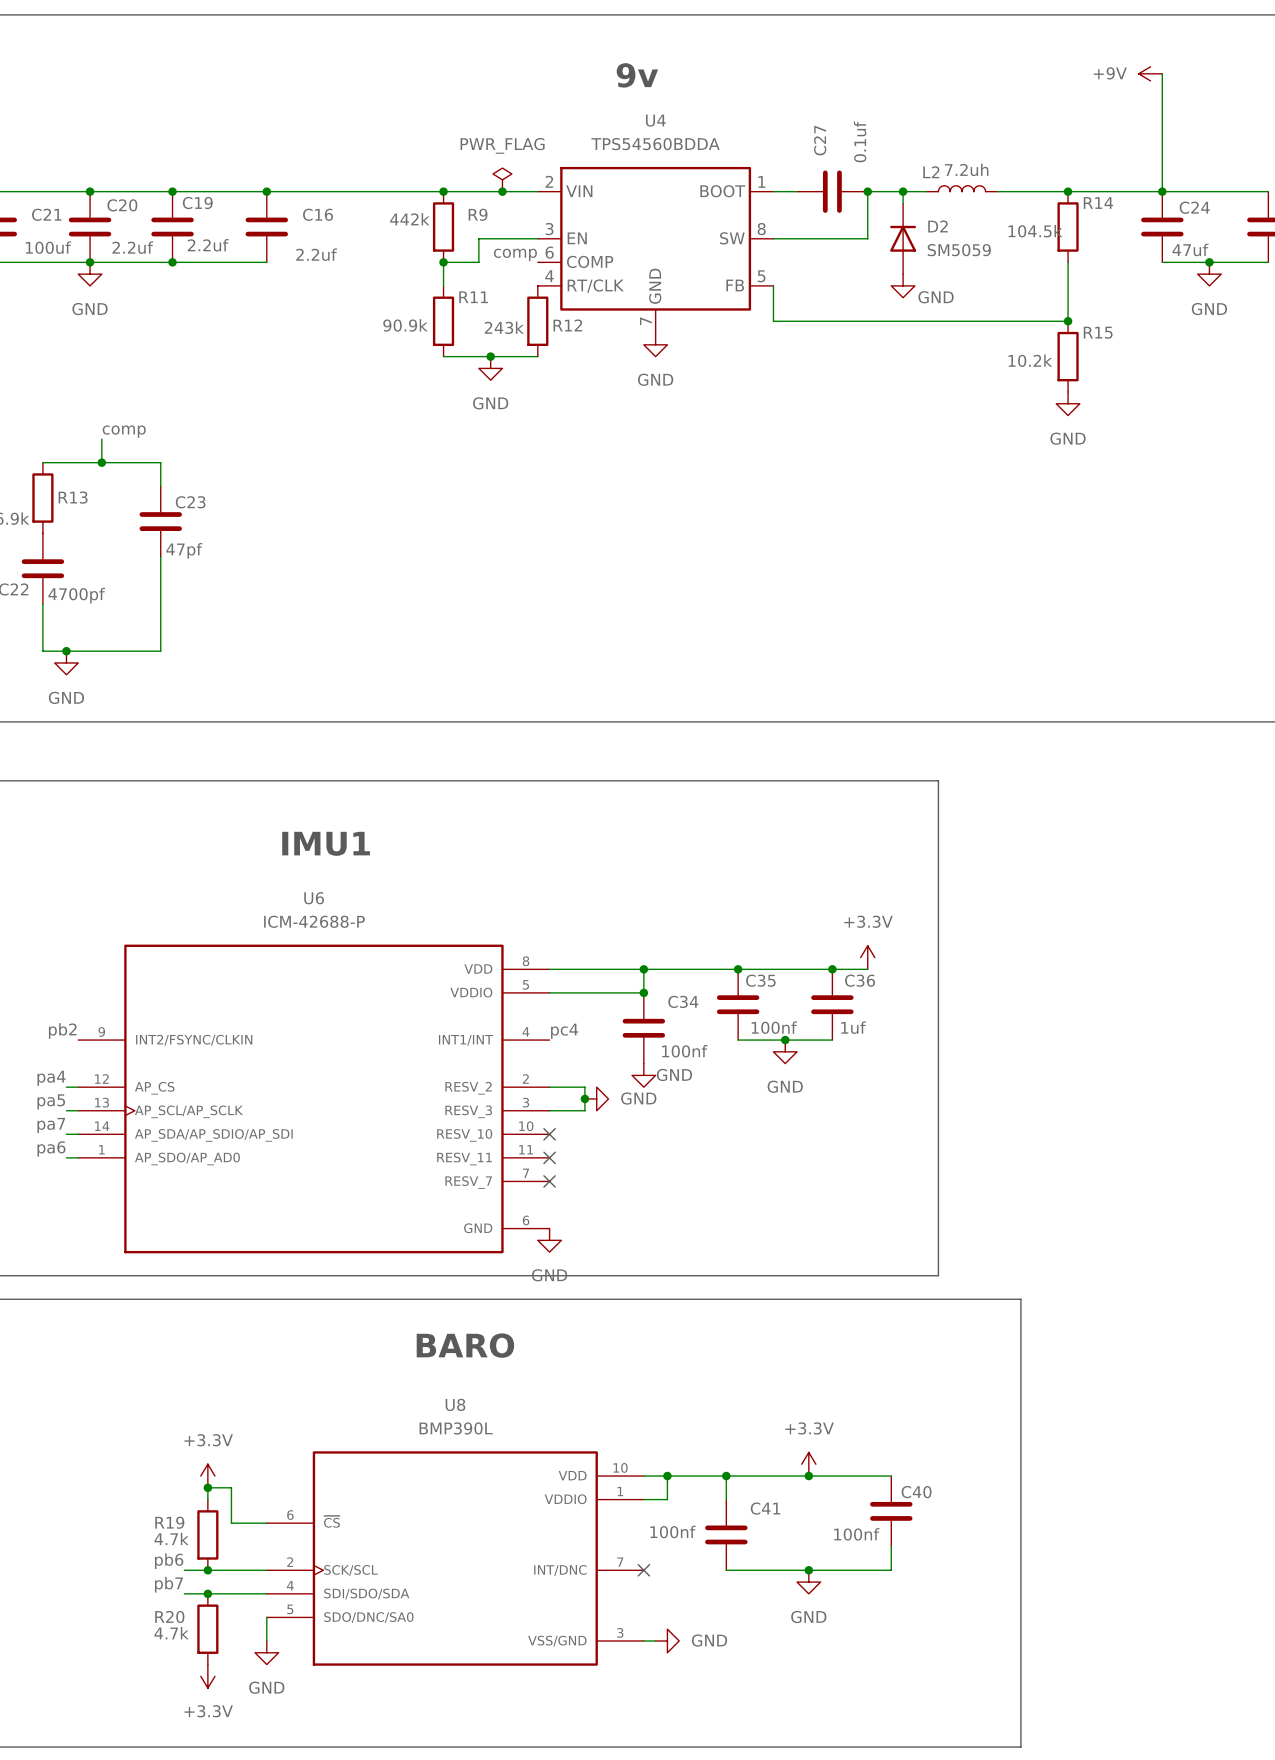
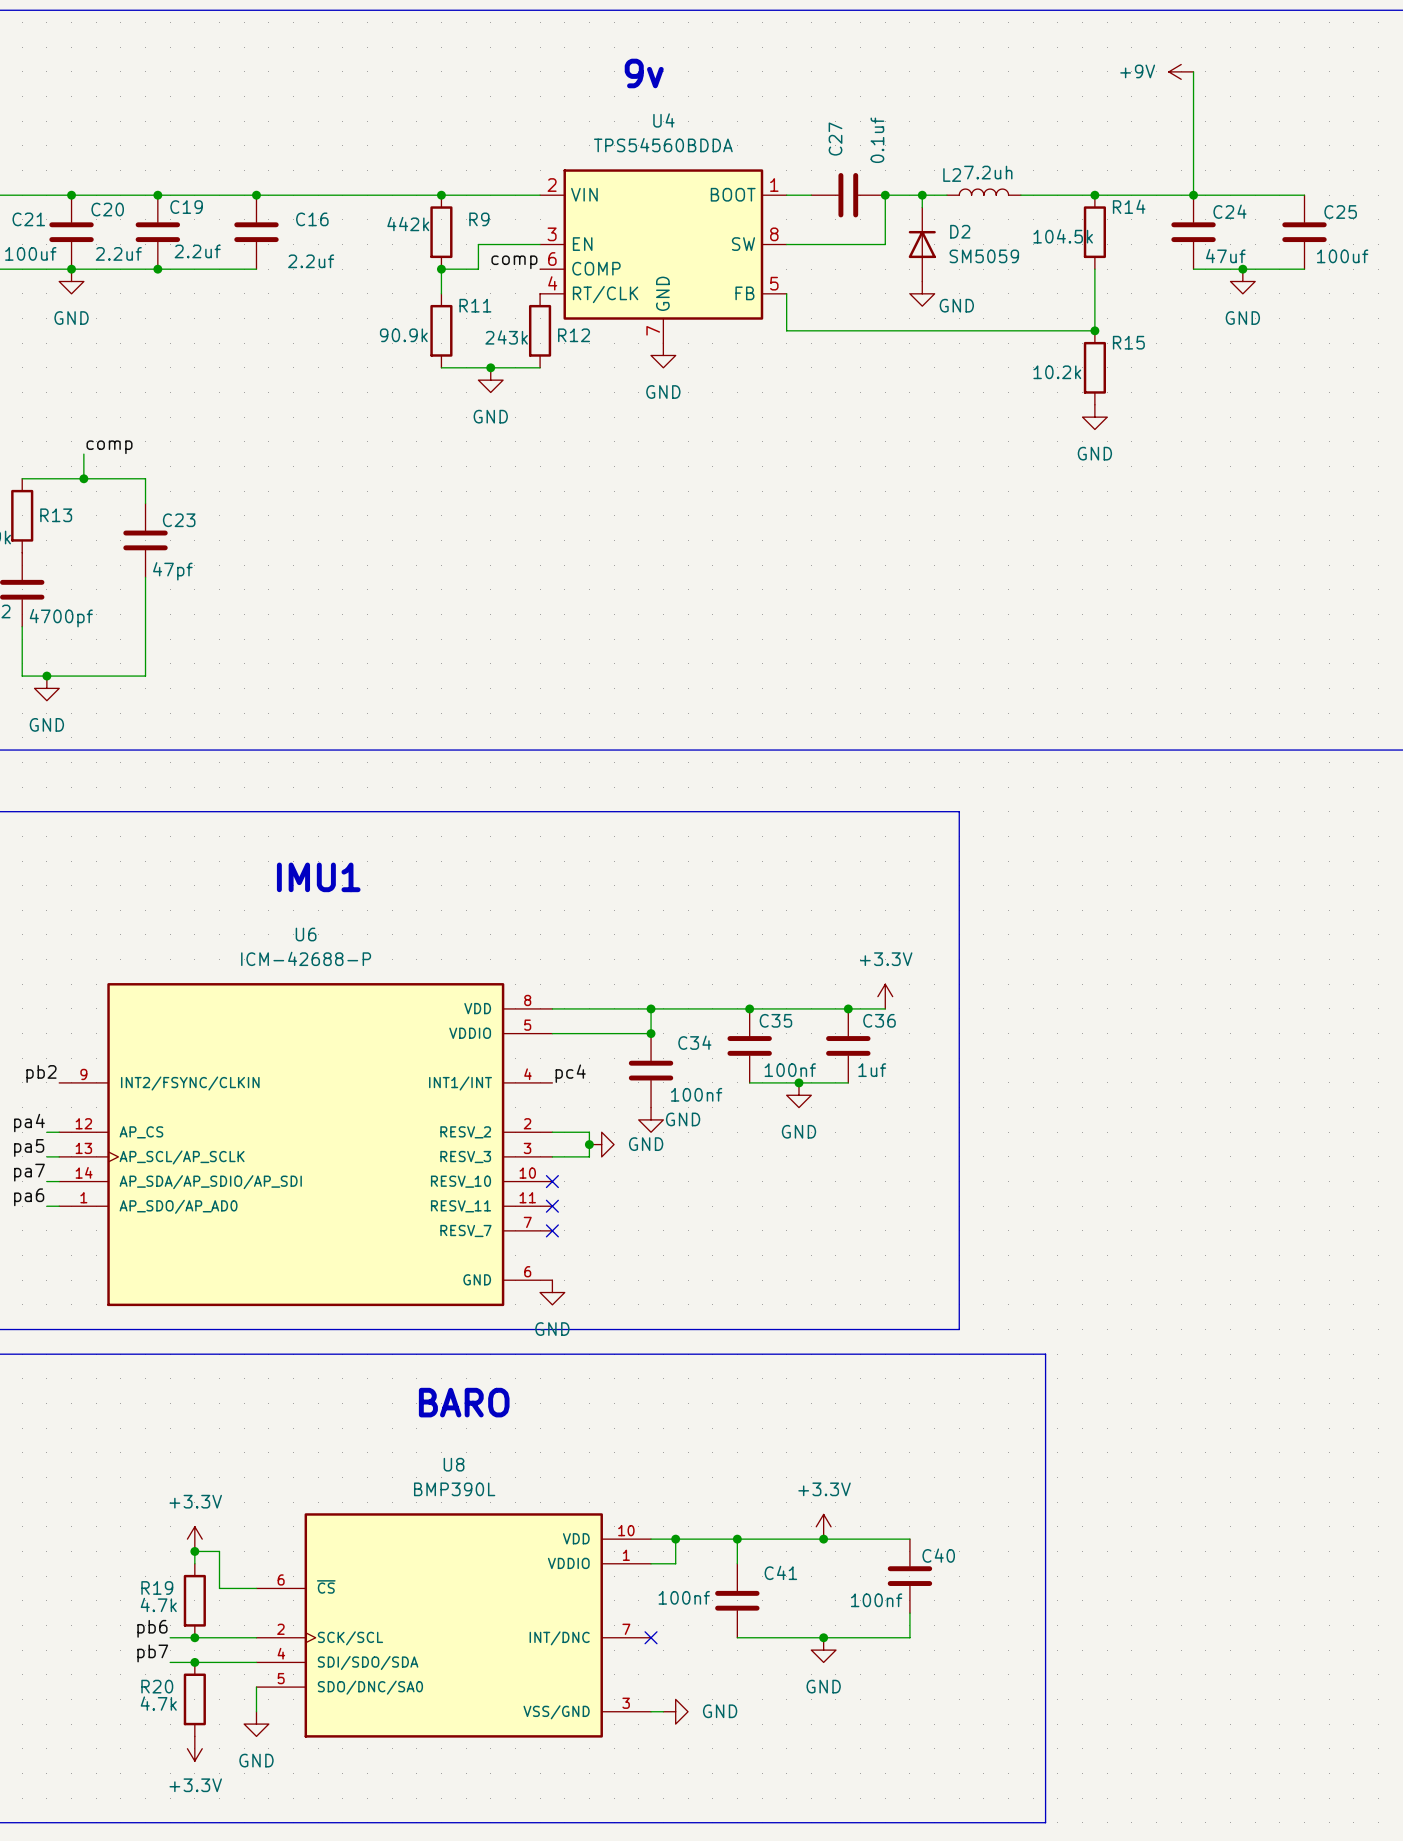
power symbol: PWR_FLAG (502, 179) -> none
junction: (502, 191) -> none

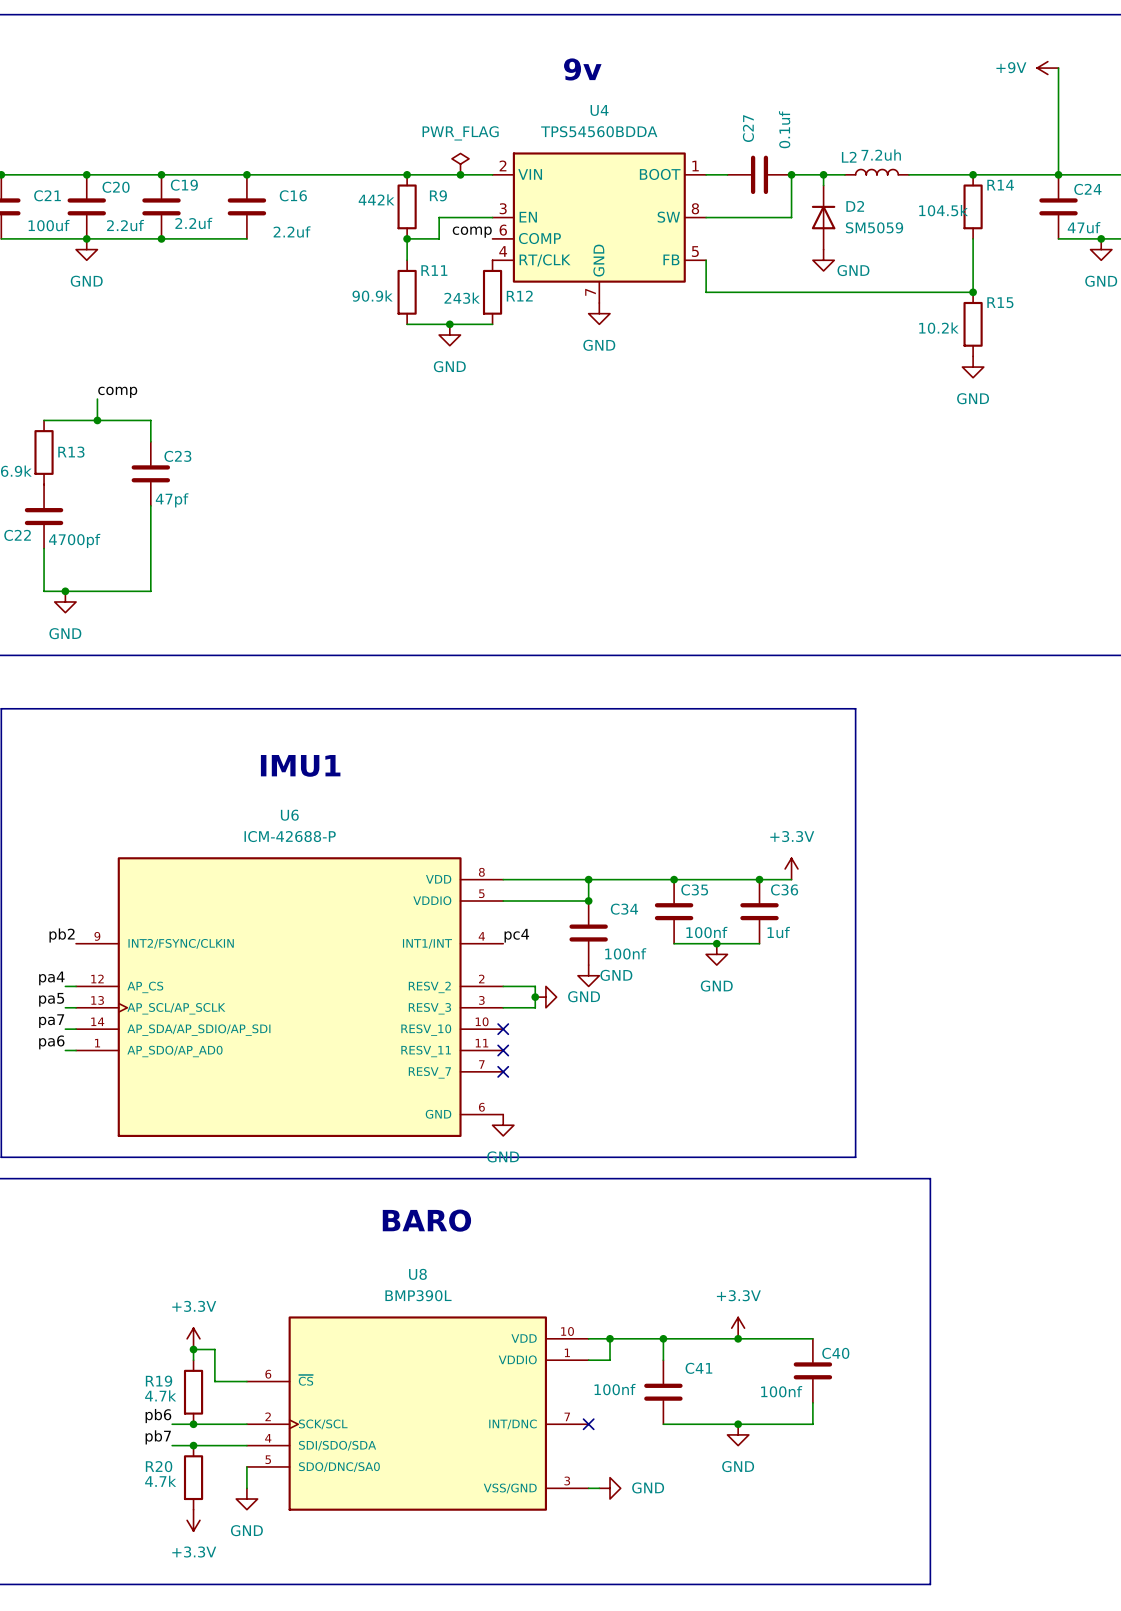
power symbol: none -> PWR_FLAG (460, 164)
junction: none -> (460, 174)

